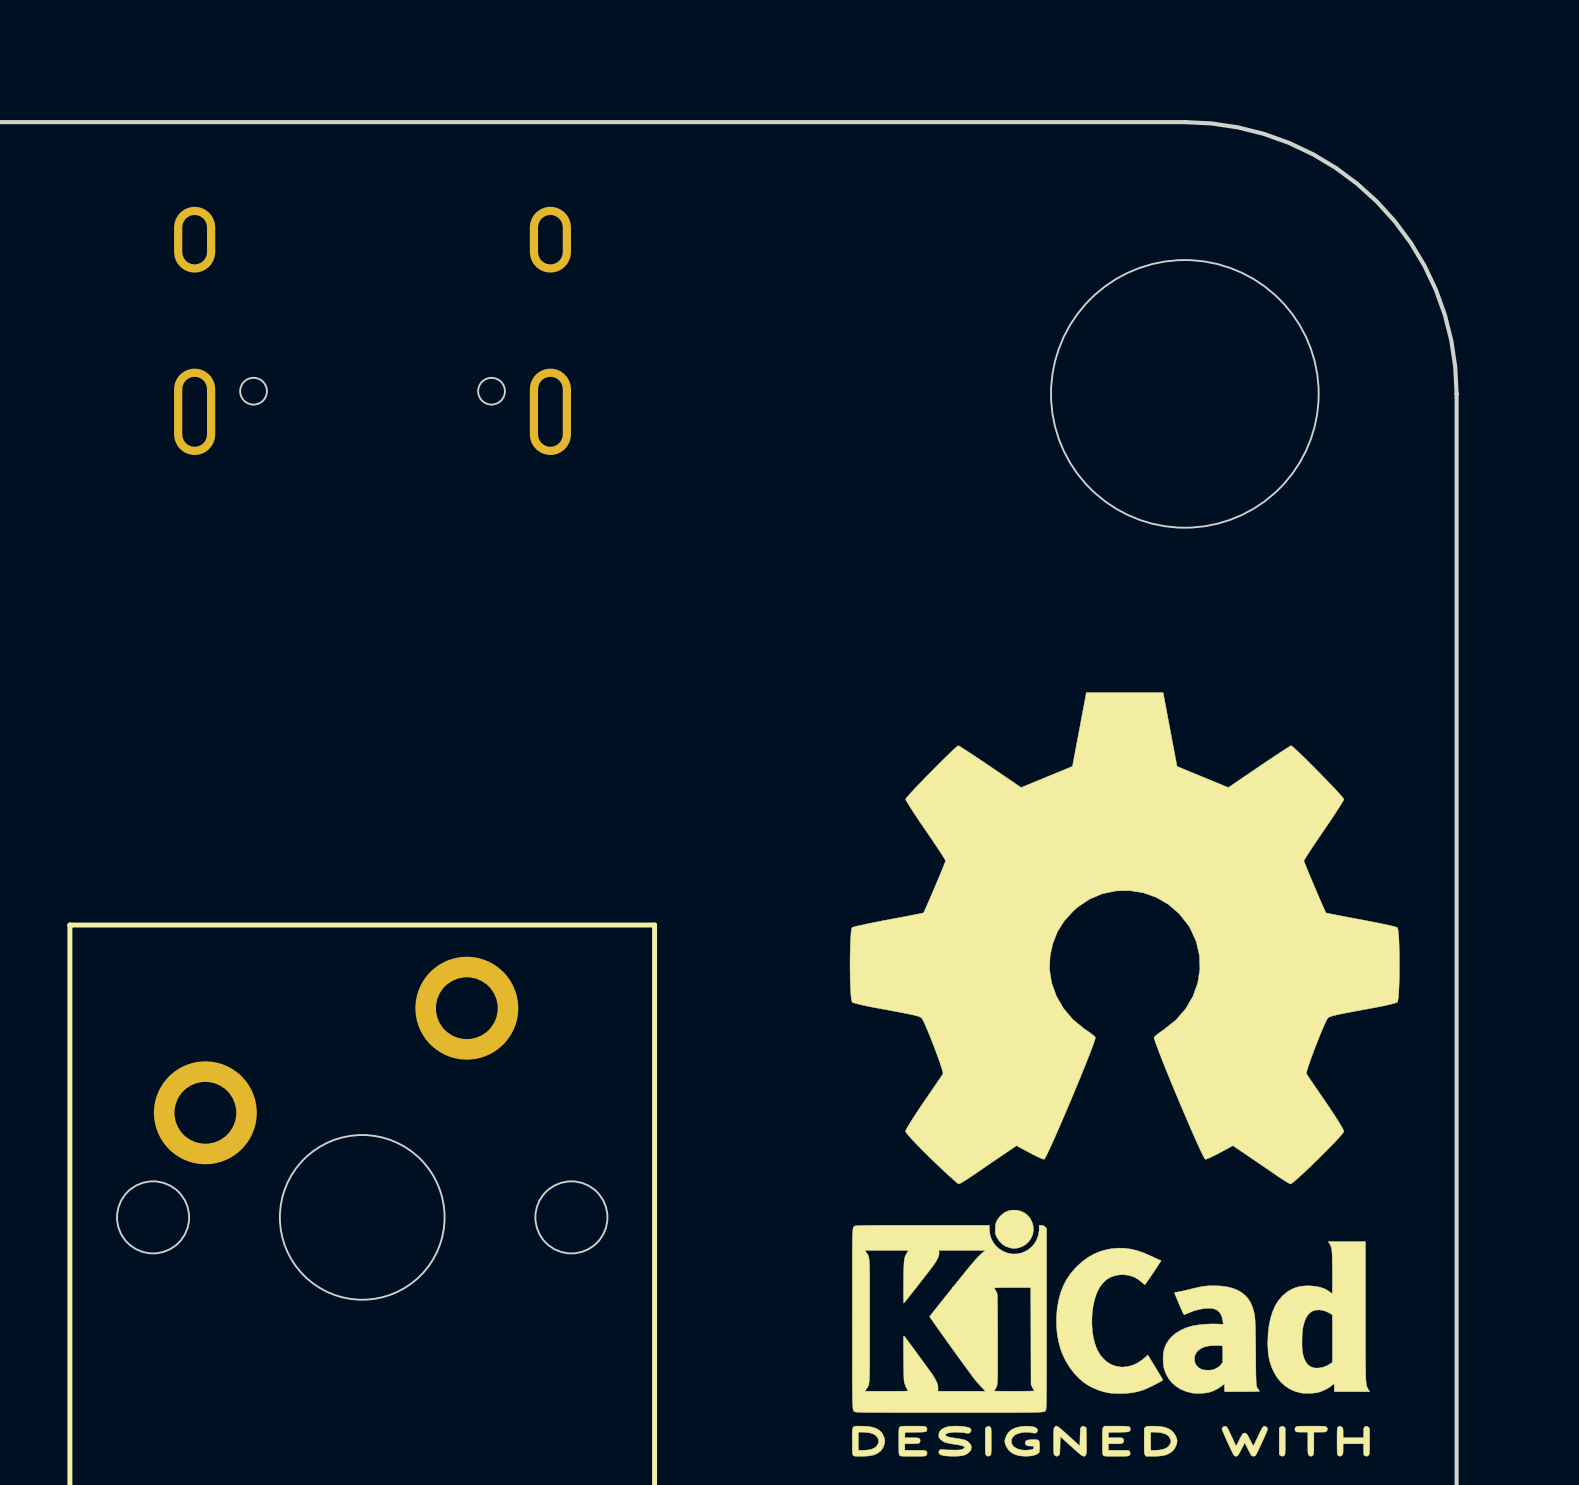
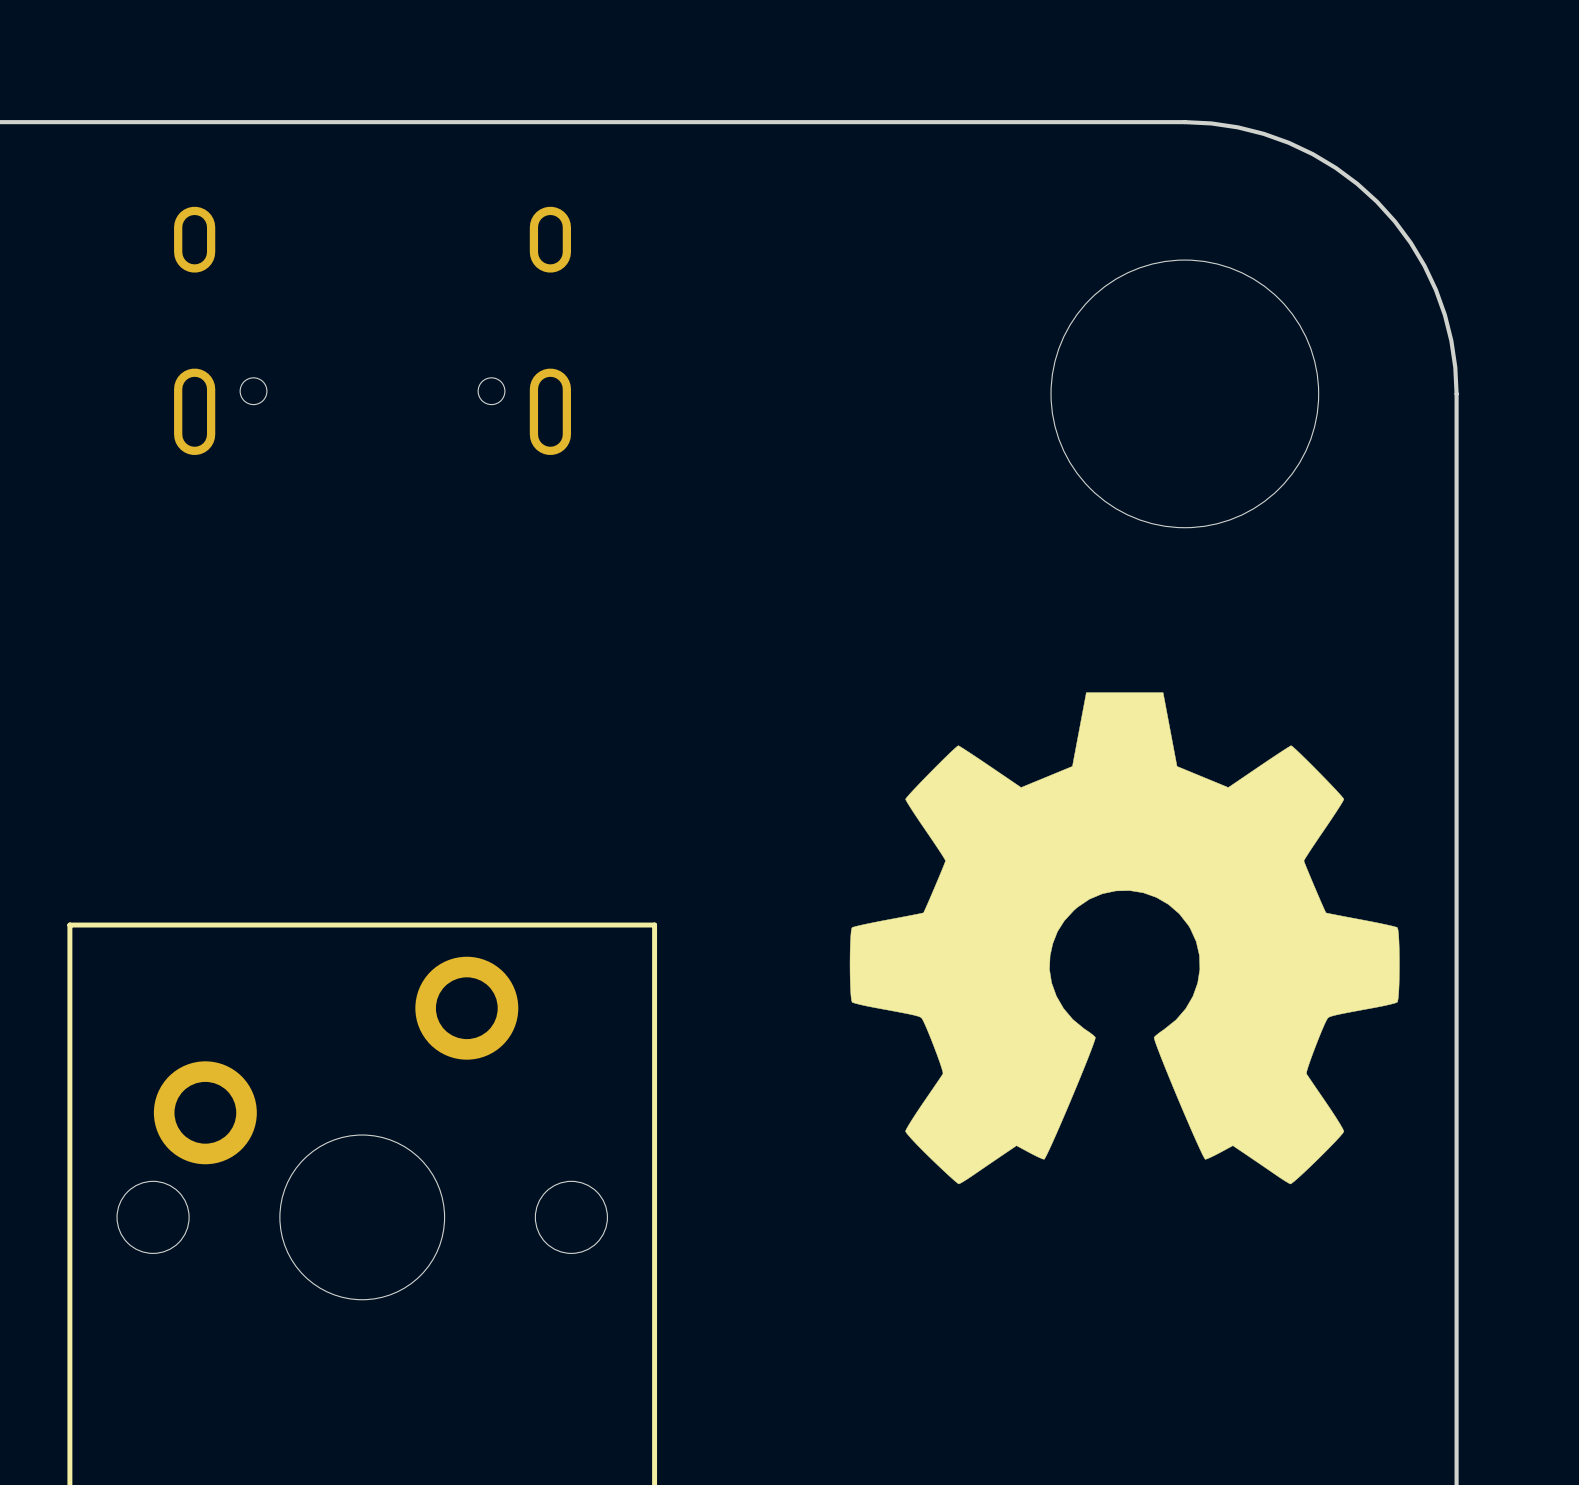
drawing: [852, 1209, 1370, 1457] -> none

